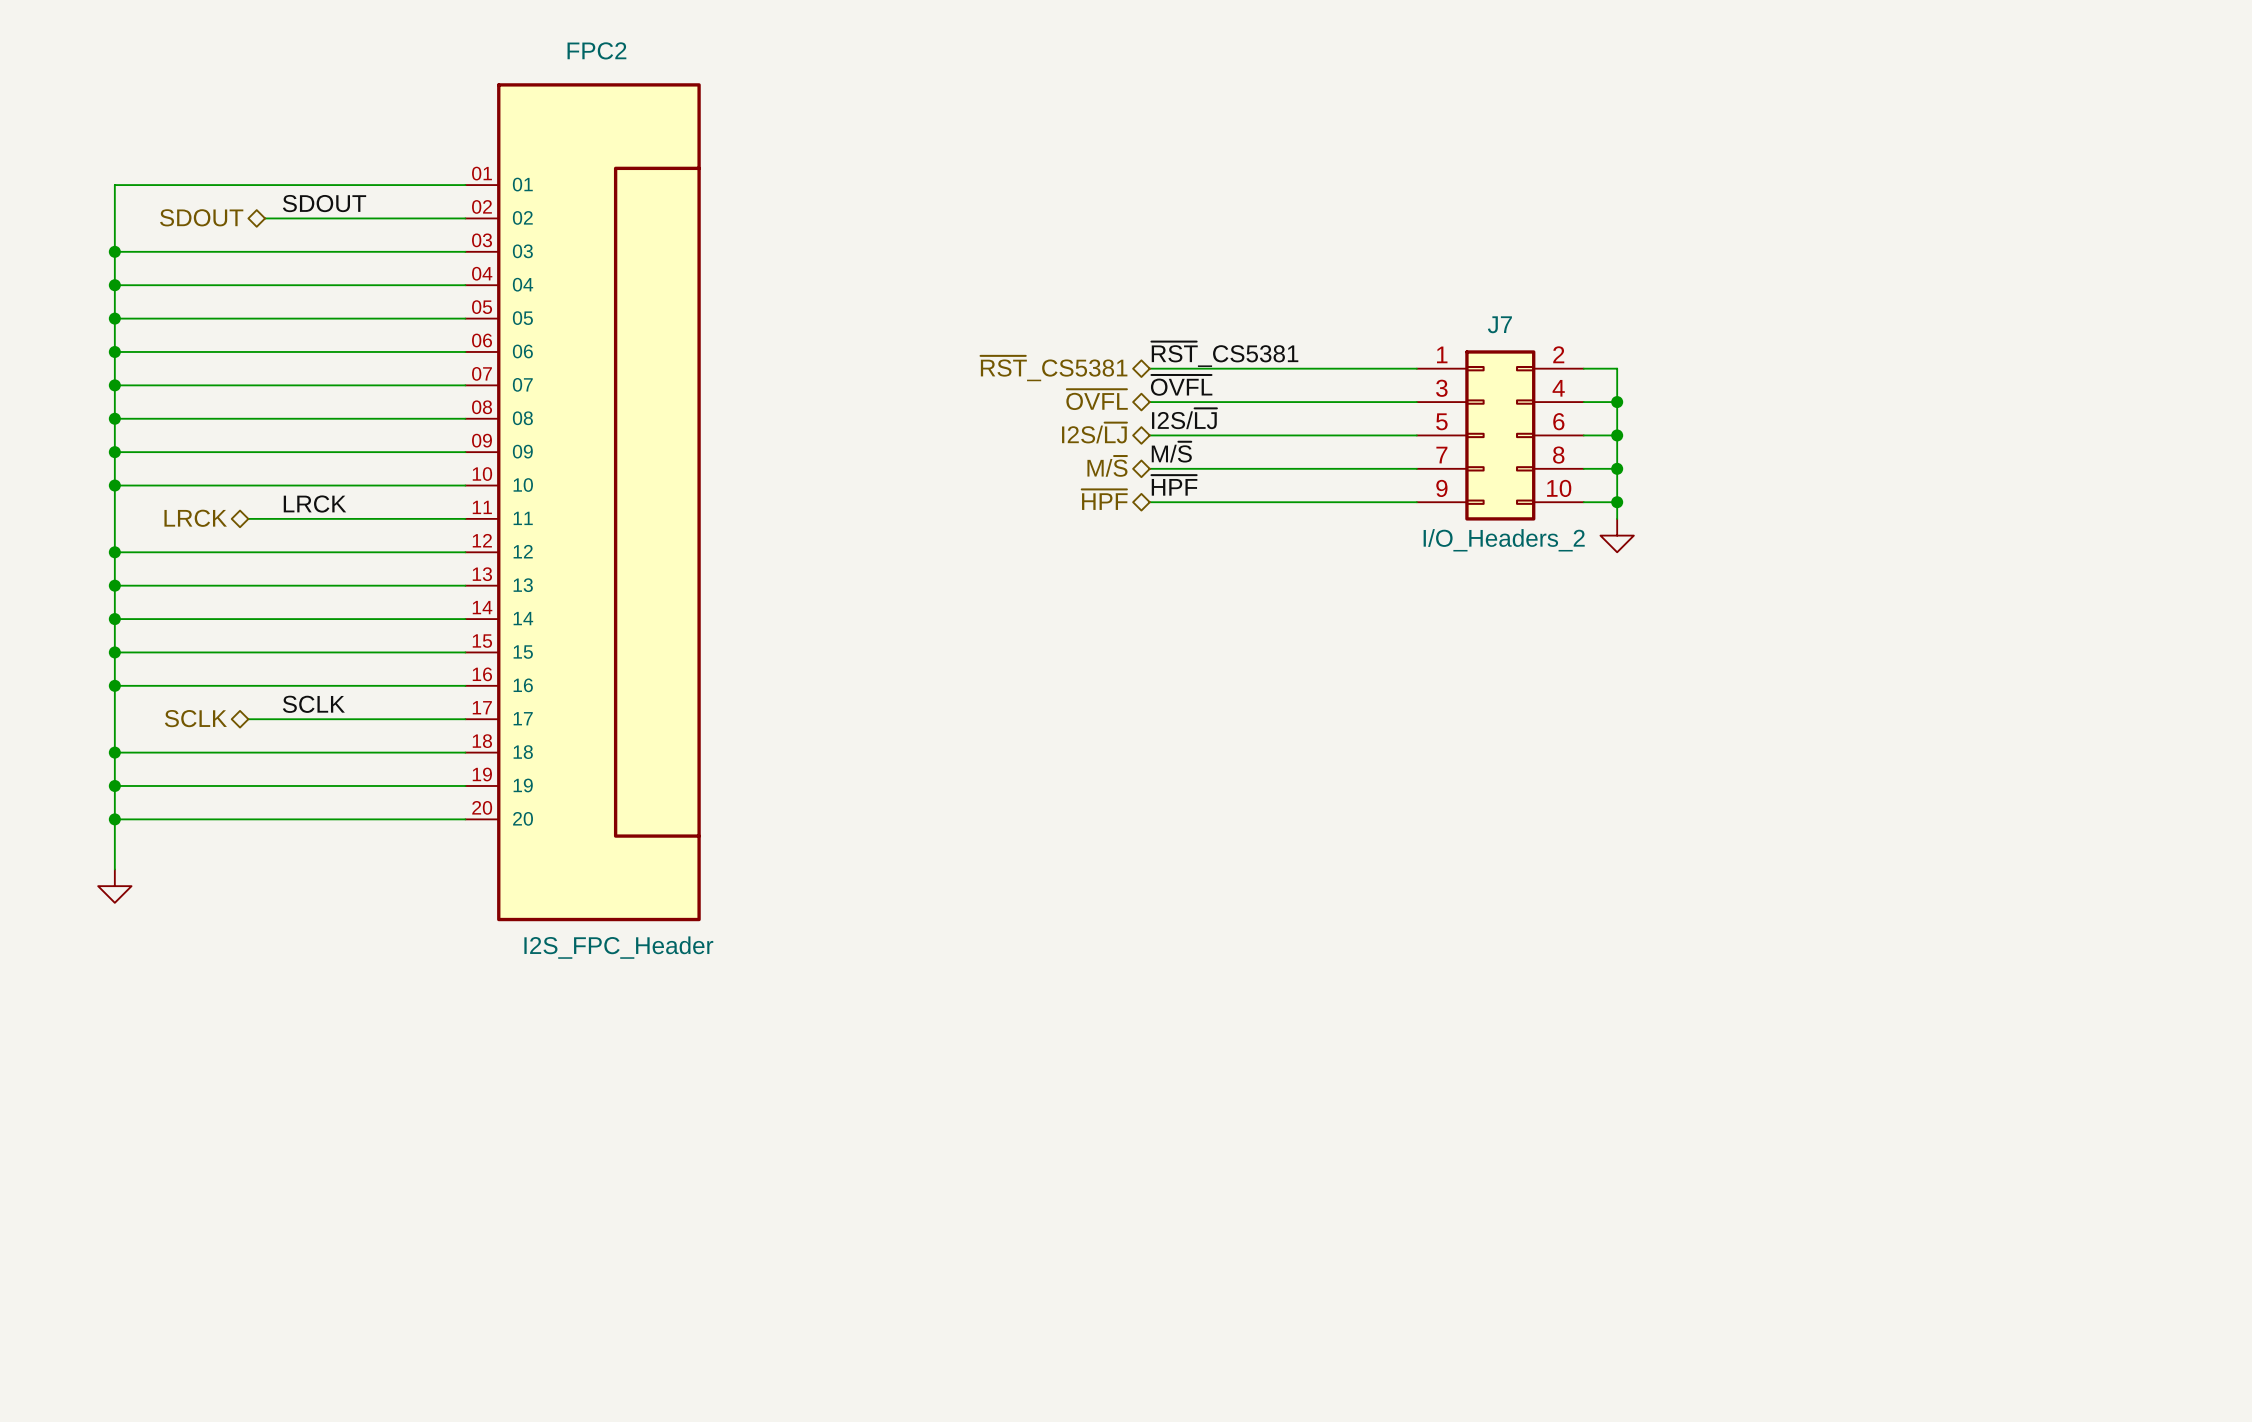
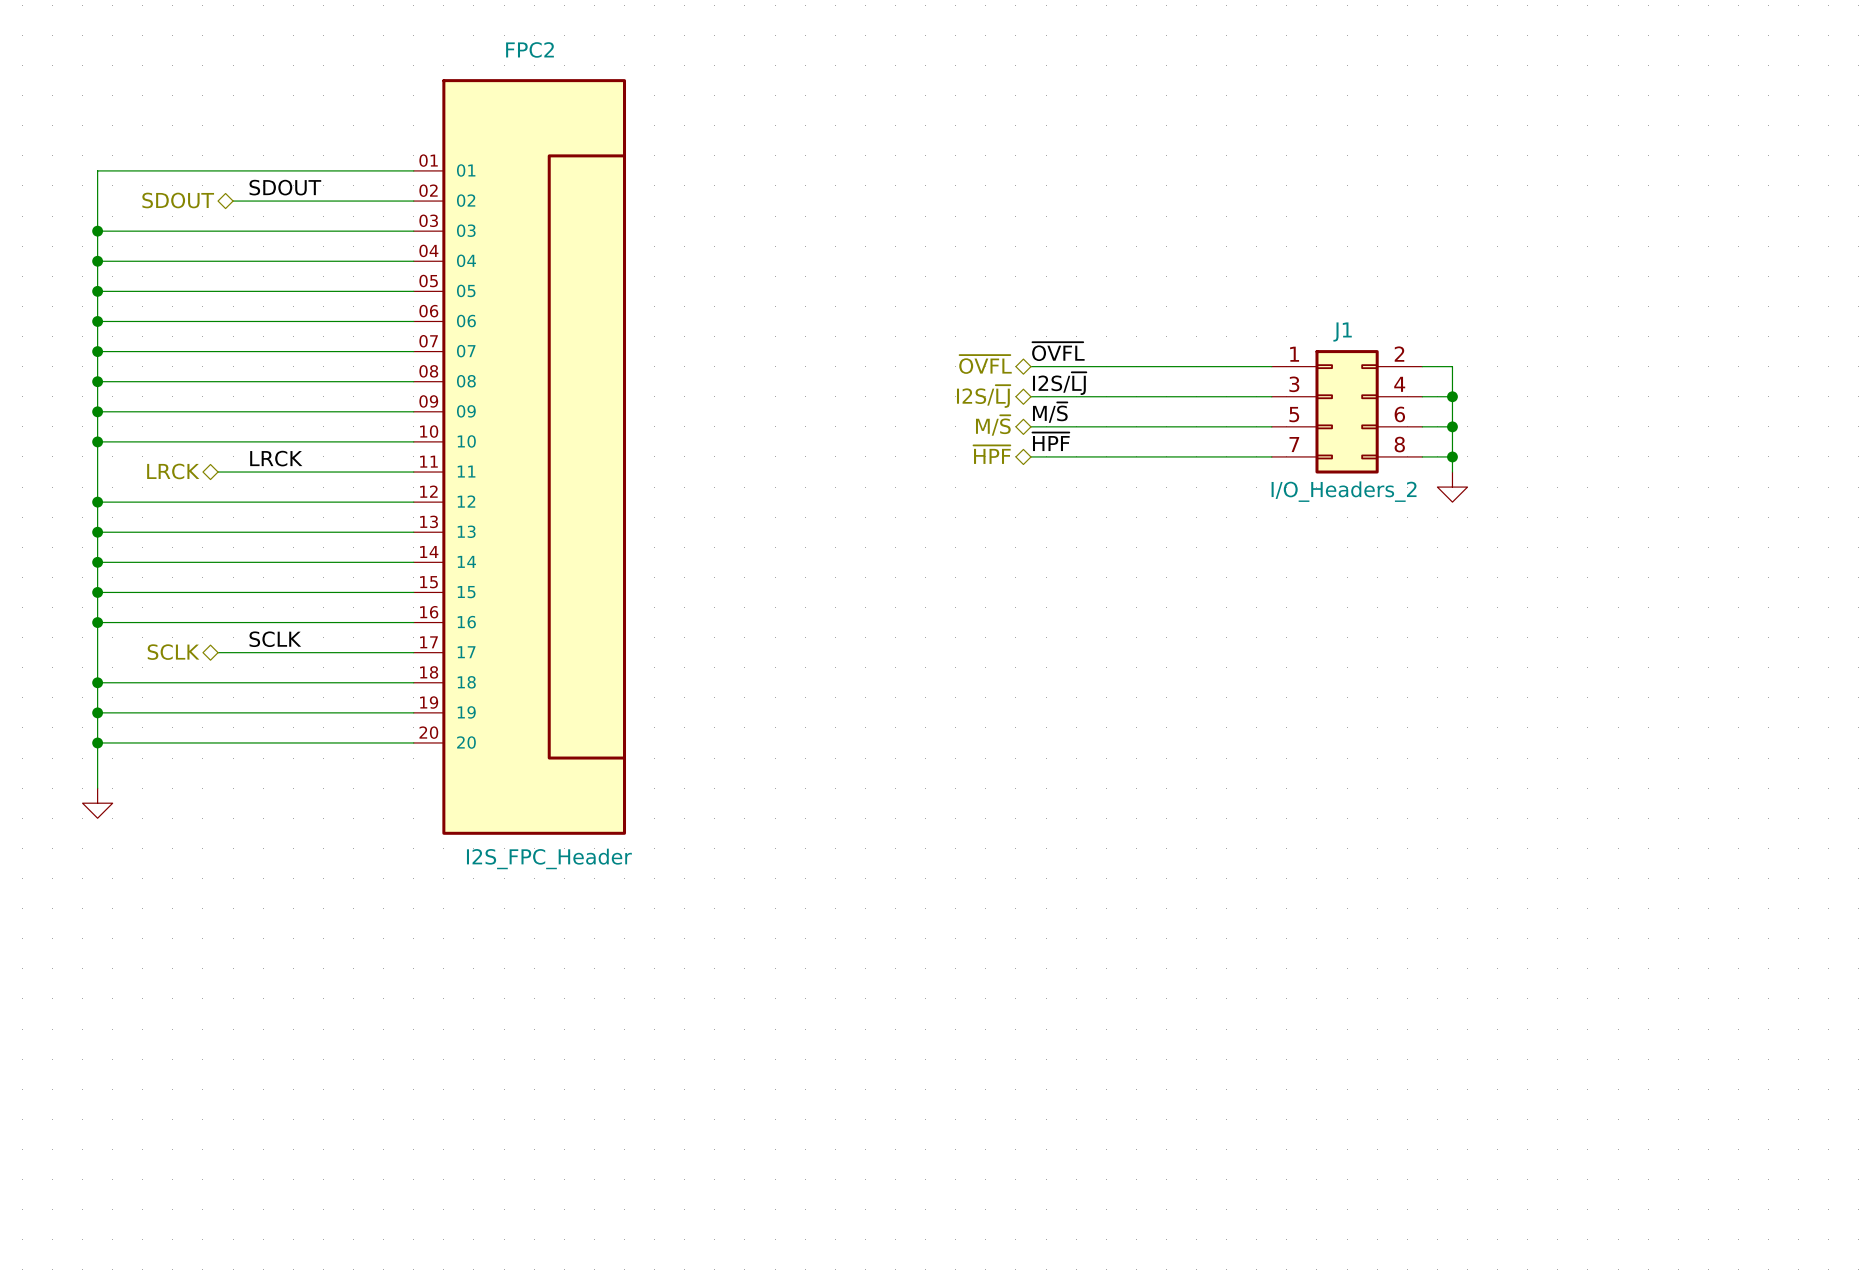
label: ~{RST}_CS5381 (1224, 354) -> none
hierarchical label: ~{RST}_CS5381 (1053, 368) -> none
wire: (1149, 368) (1416, 368) -> none
wire: (1583, 368) (1617, 368) (1617, 402) -> none
junction: (1617, 402) -> none
J7: I/O_Headers_2 (1500, 435) -> none
J1: none -> I/O_Headers_2 (1347, 411)

